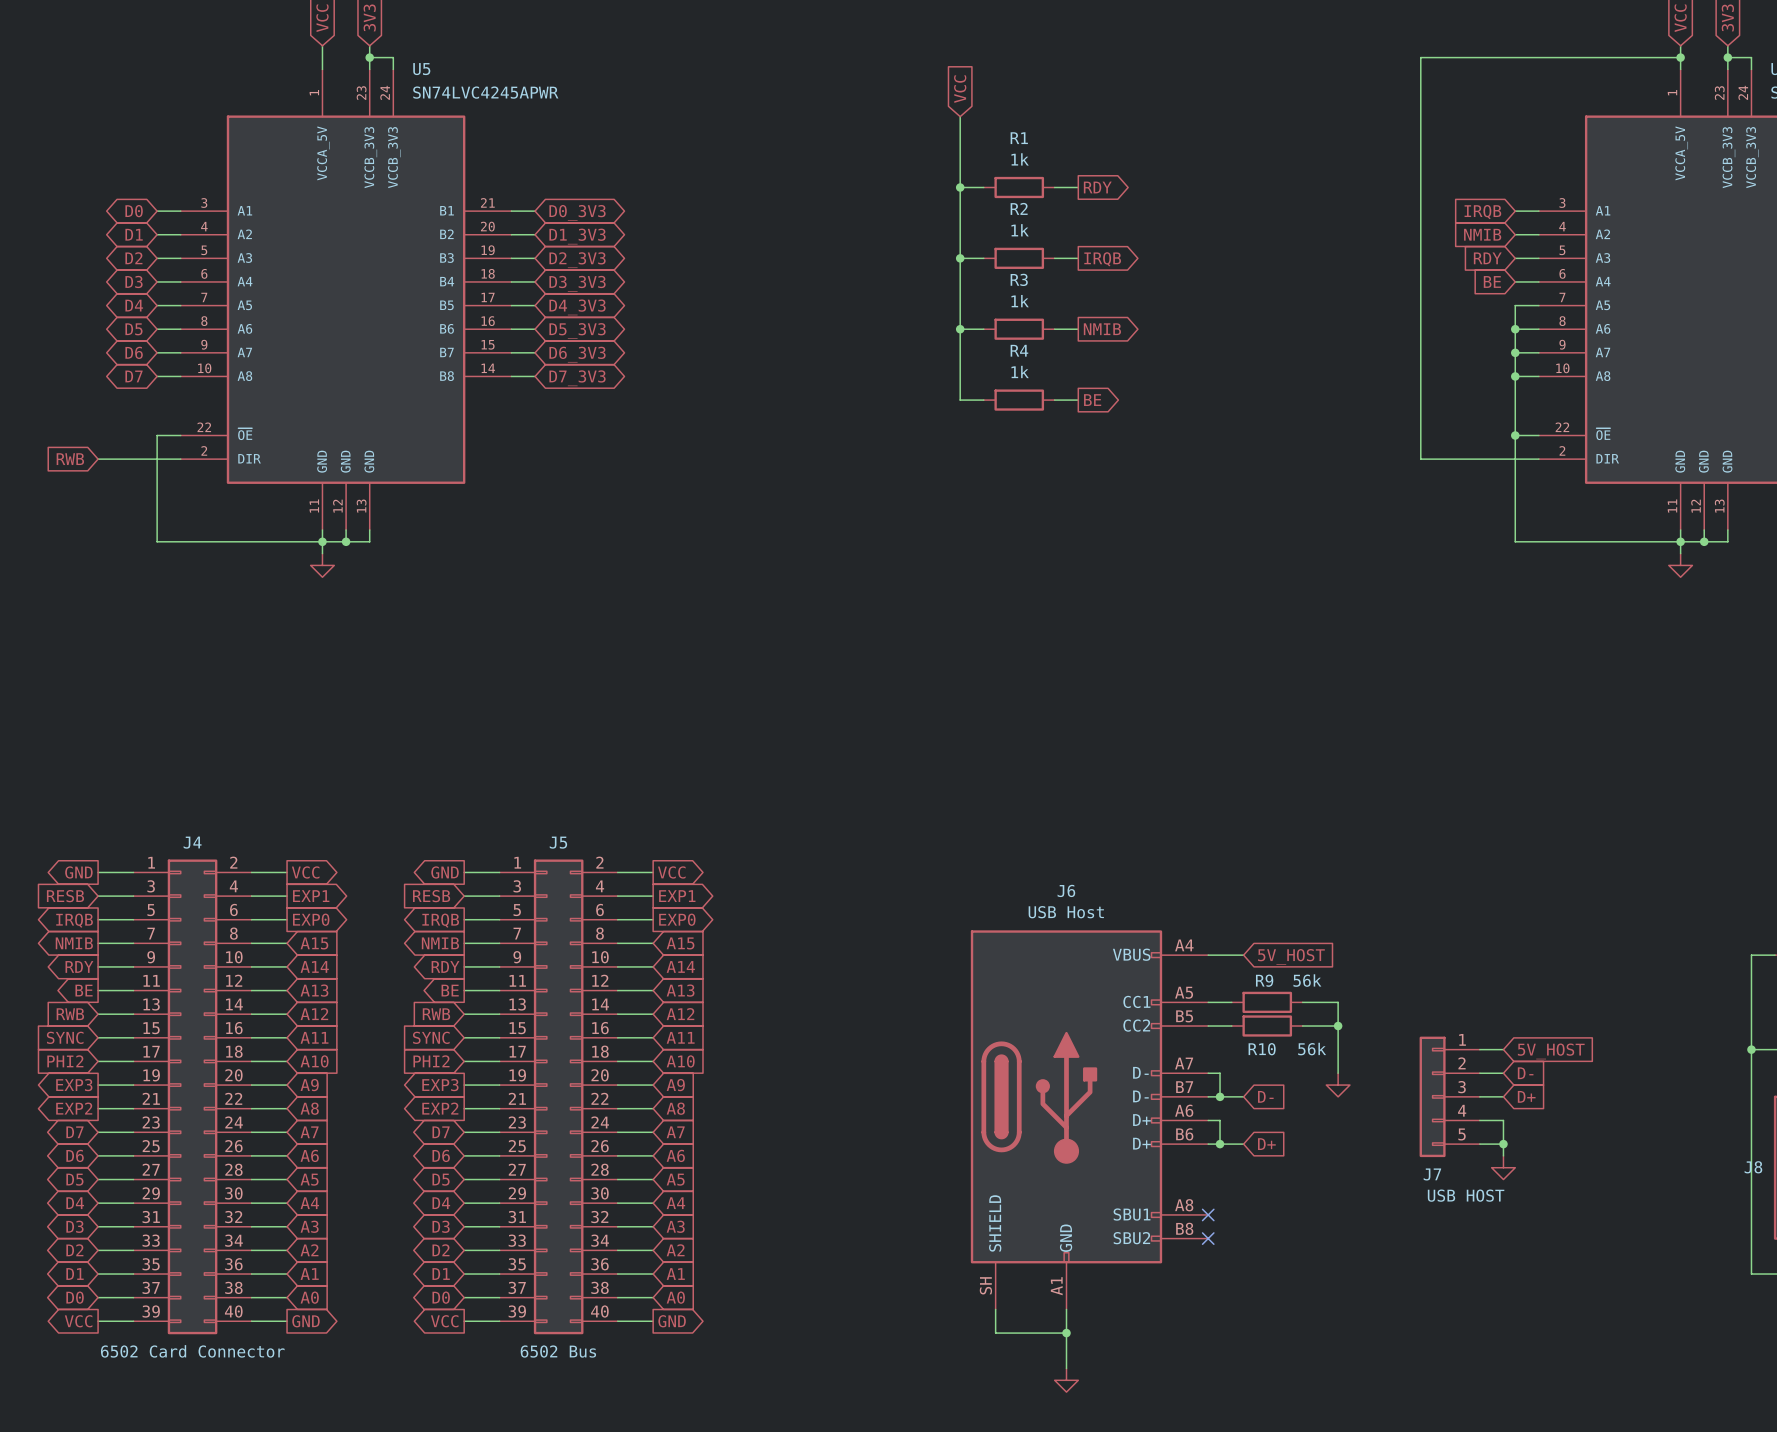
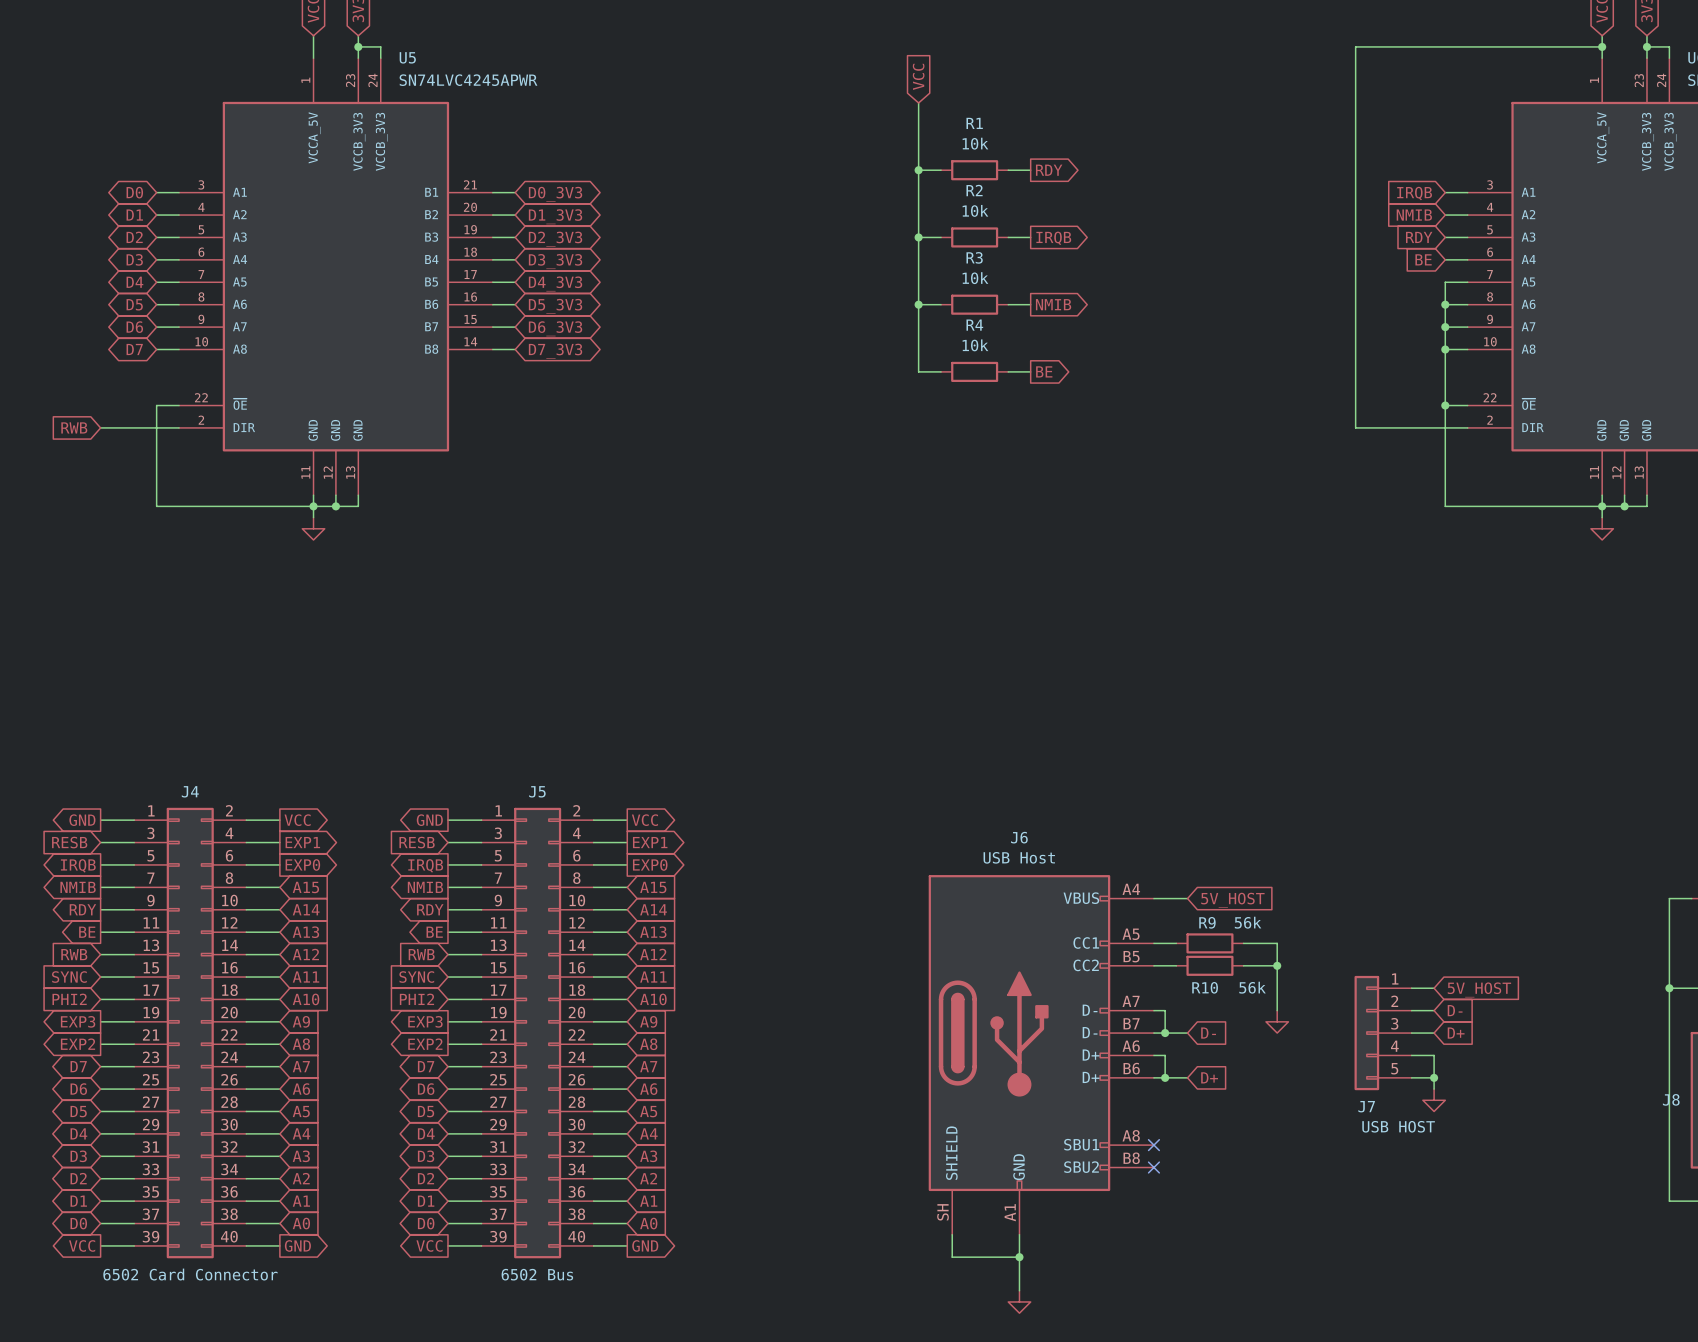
R1 value: 1k (1020, 159) -> 10k (975, 143)
R2 value: 1k (1020, 230) -> 10k (975, 210)
R3 value: 1k (1020, 301) -> 10k (975, 278)
R4 value: 1k (1020, 371) -> 10k (975, 345)

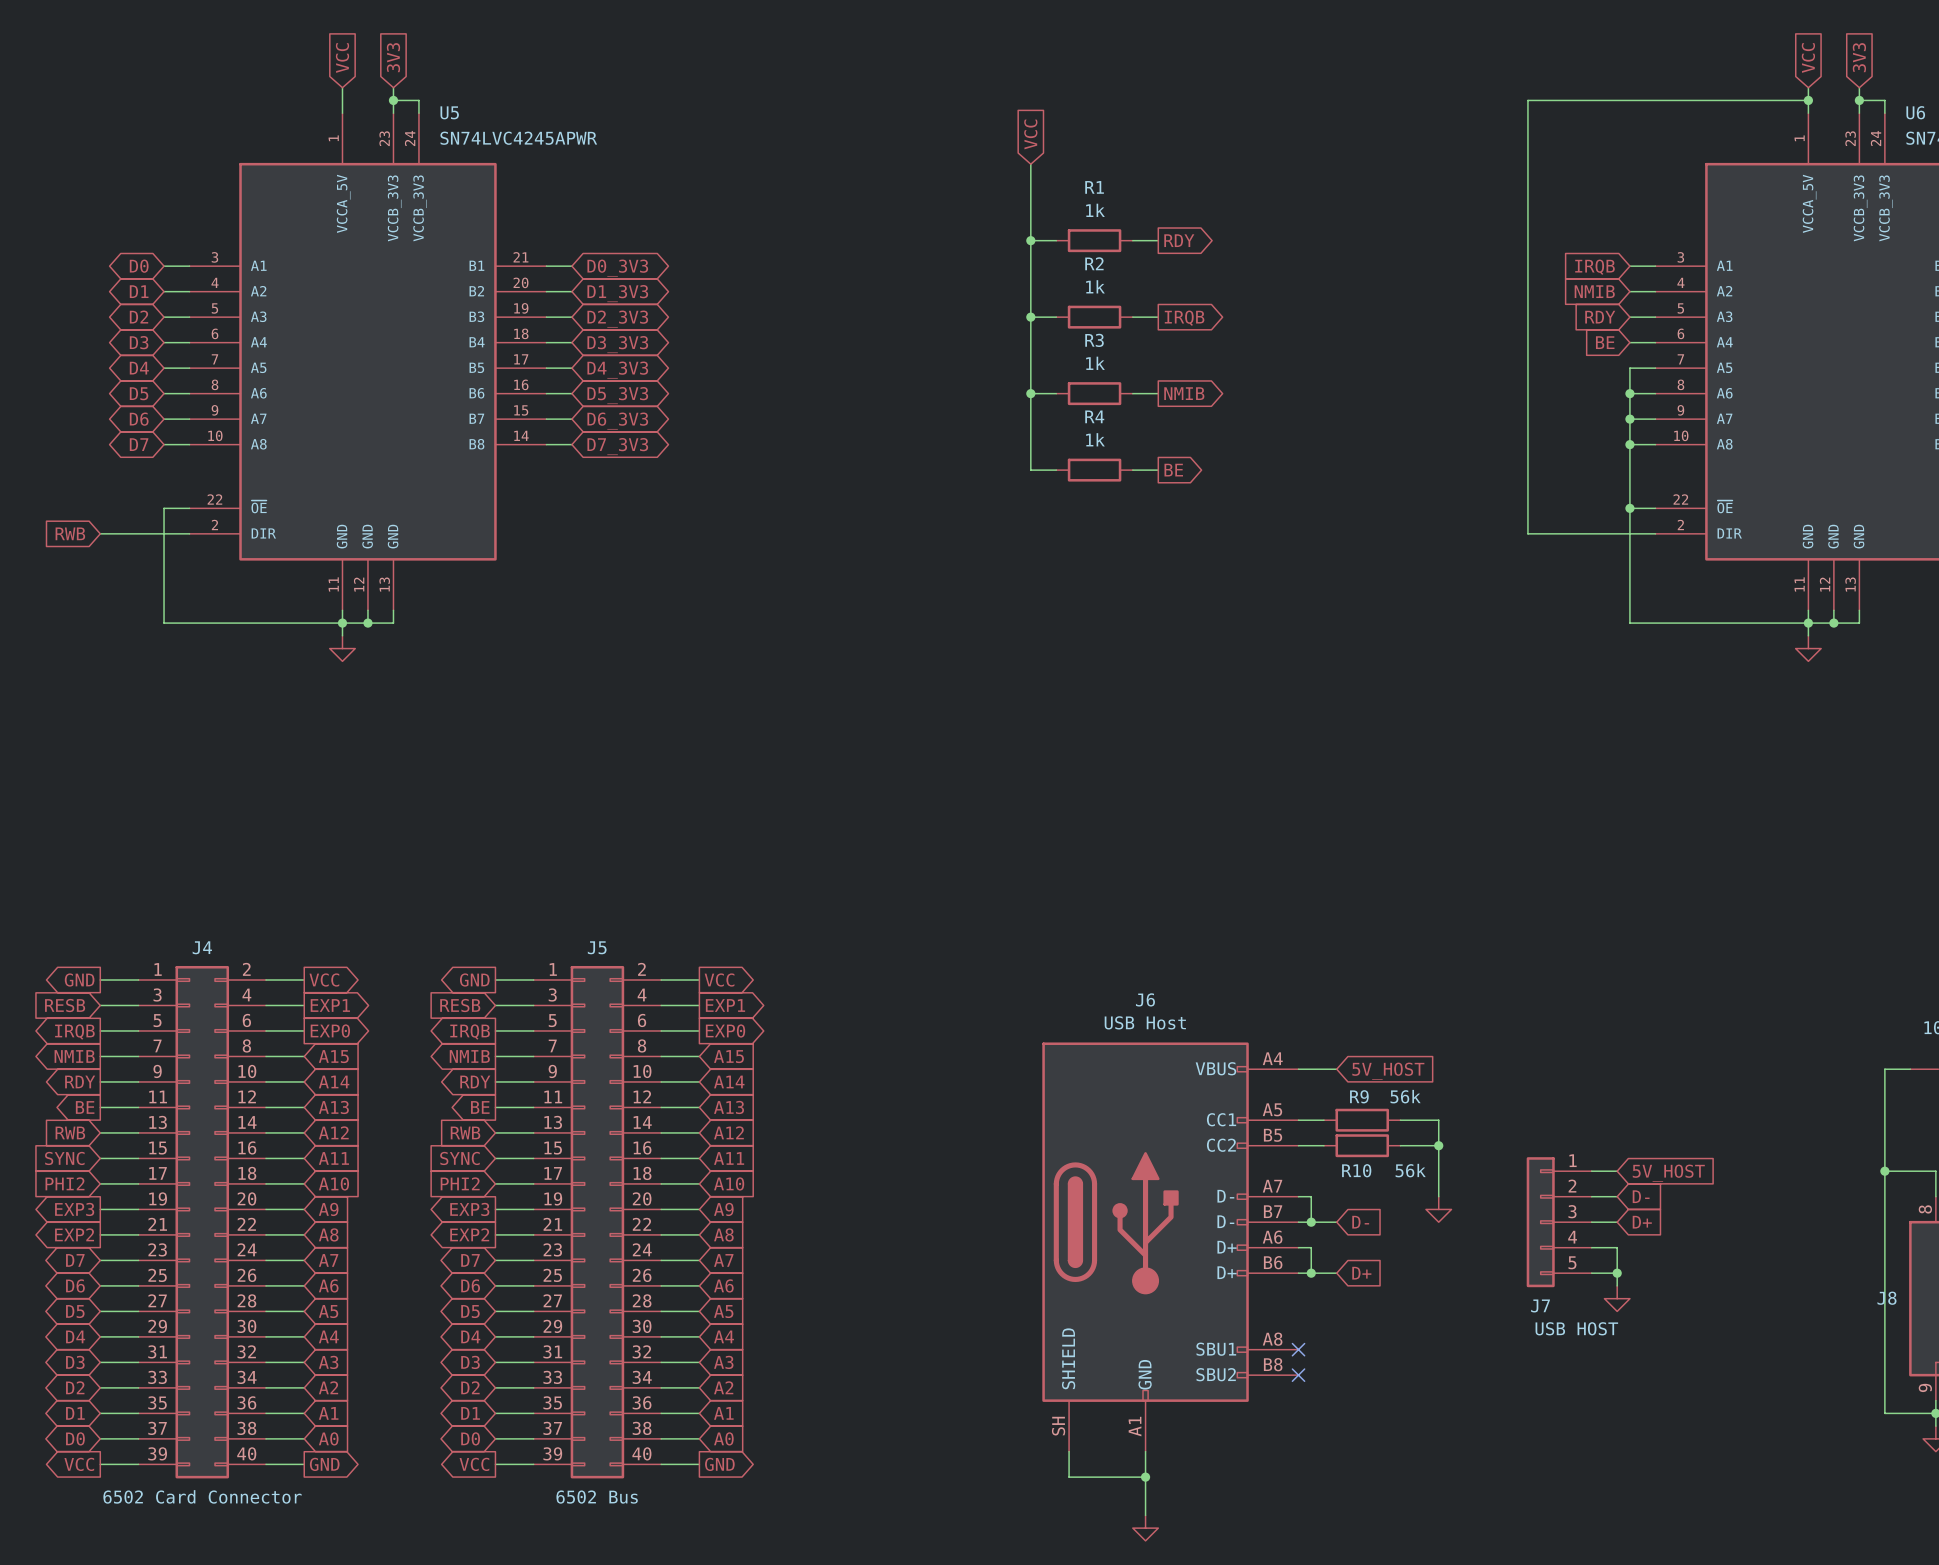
R1 value: 10k (975, 143) -> 1k (1095, 210)
R2 value: 10k (975, 210) -> 1k (1095, 286)
R3 value: 10k (975, 278) -> 1k (1095, 363)
R4 value: 10k (975, 345) -> 1k (1095, 439)

